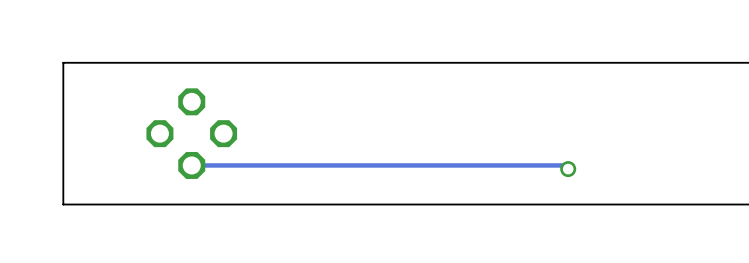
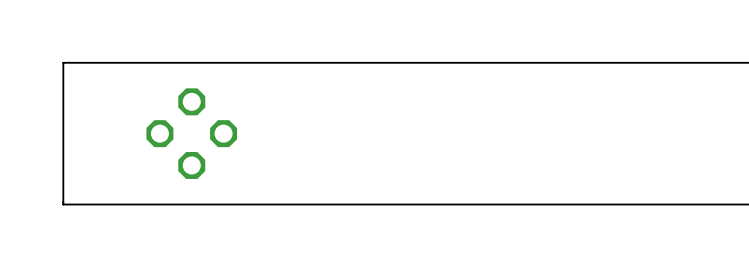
track: (191, 165) (564, 165) (568, 169) -> none
via: (568, 169) -> none

